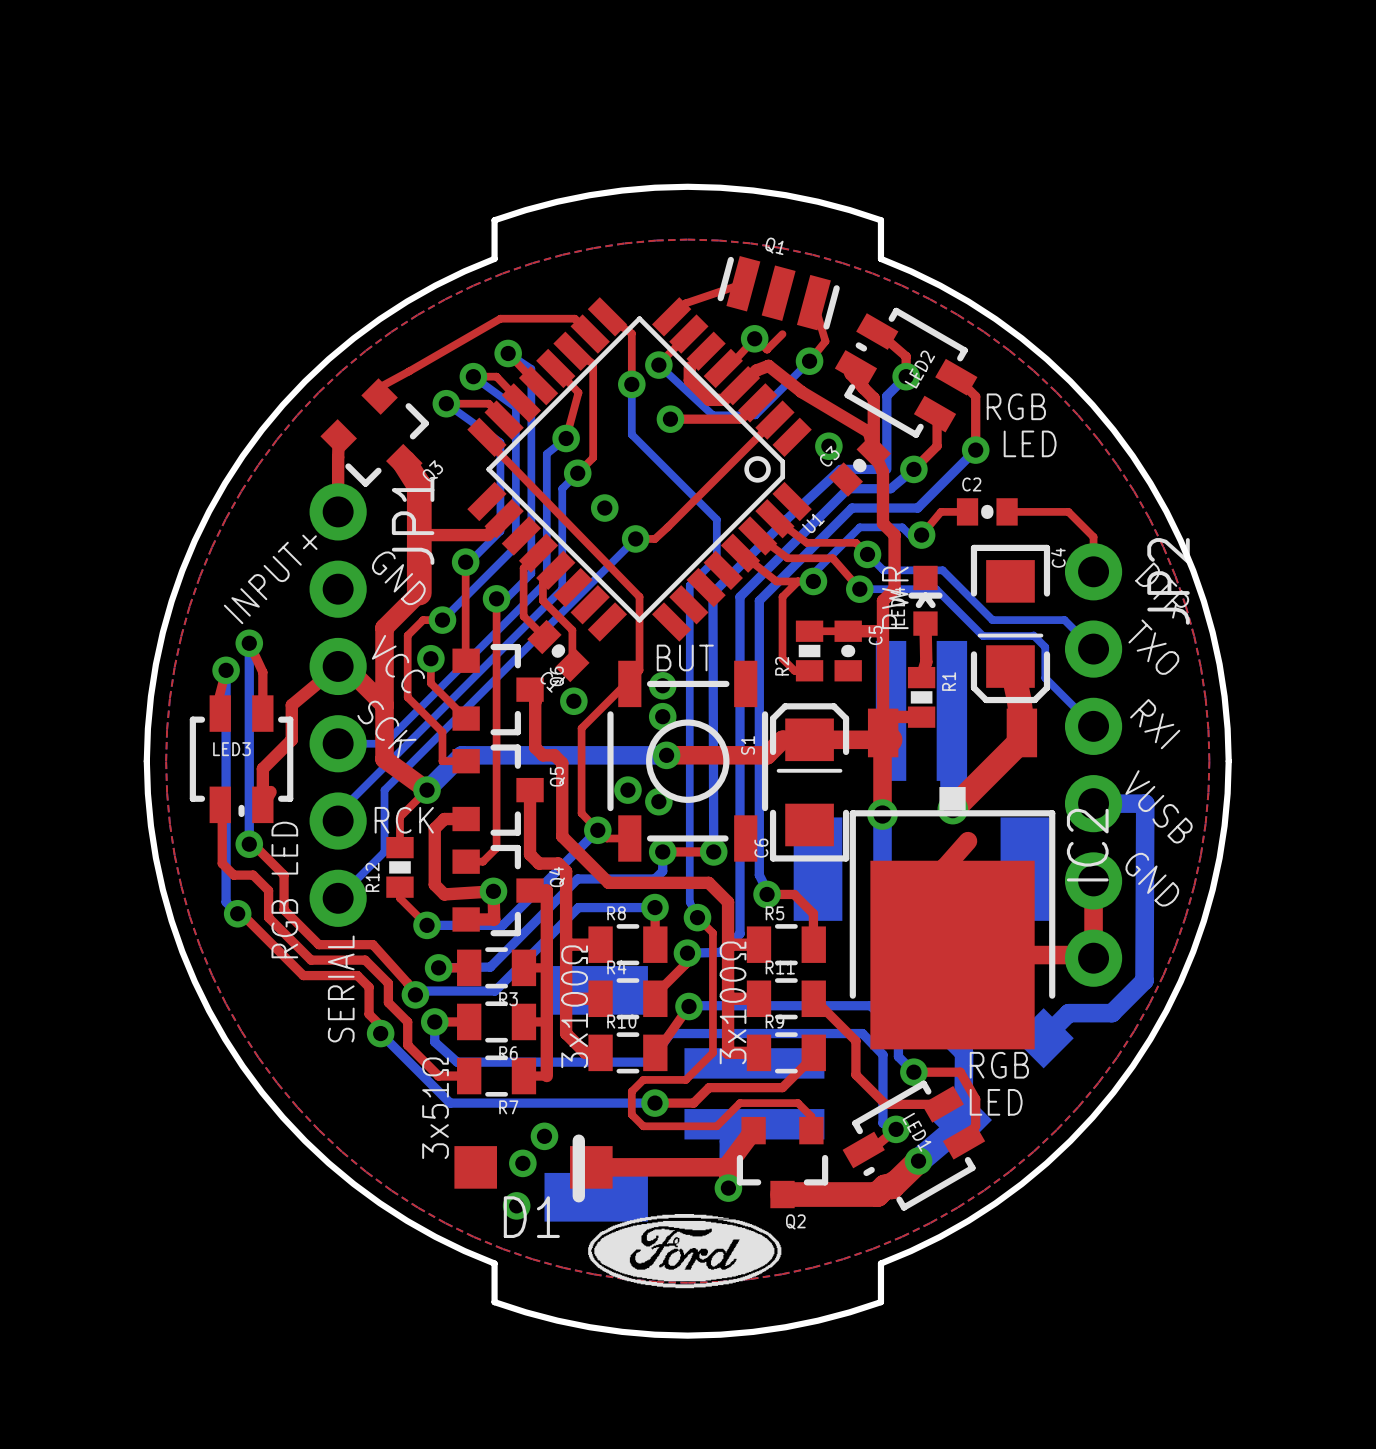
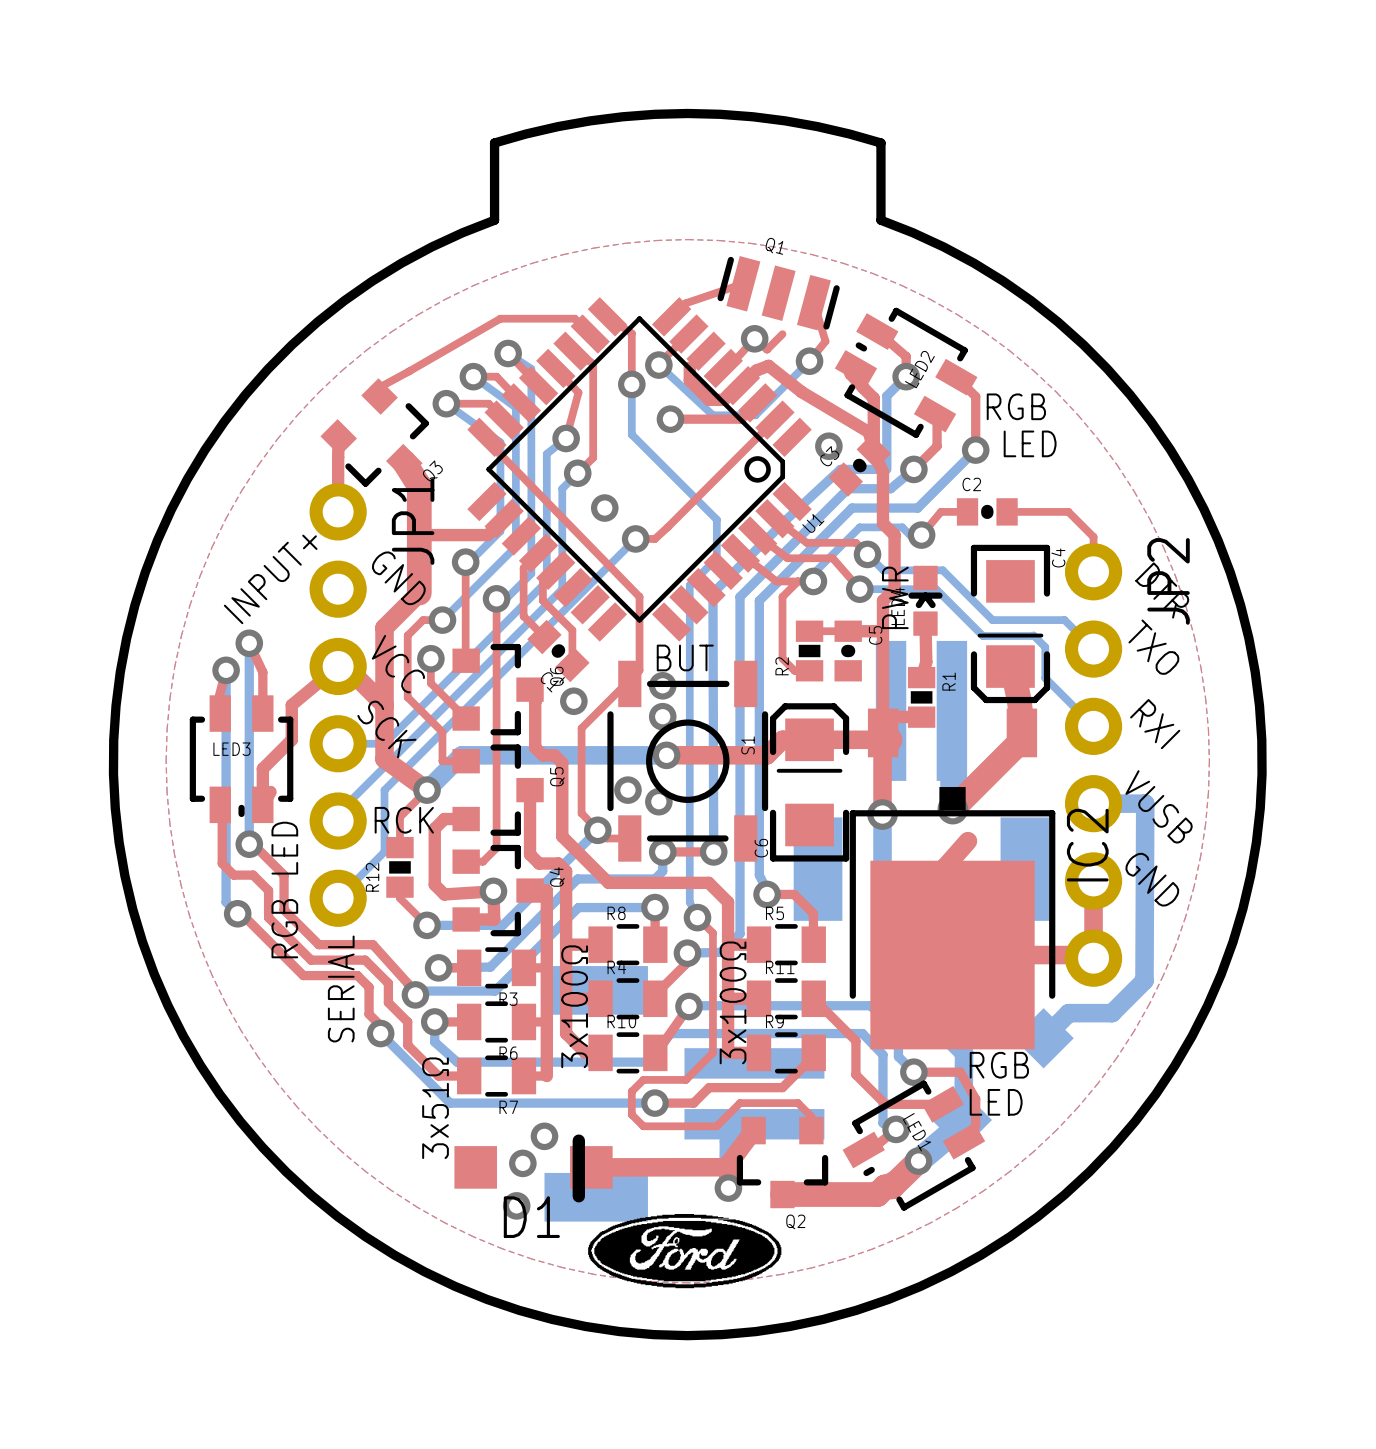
board edge: (494, 220) (494, 258) (435, 285) (379, 319) (328, 359) (282, 405) (242, 456) (209, 511) (194, 540) (171, 601) (155, 664) (147, 728) (146, 761) (147, 793) (155, 858) (171, 921) (182, 951) (209, 1010) (225, 1039) (242, 1066) (282, 1117) (328, 1163) (379, 1203) (435, 1236) (494, 1263) (494, 1302) (557, 1320) (589, 1327) (654, 1334) (687, 1335) (720, 1334) (785, 1327) (817, 1320) (880, 1302) (880, 1263) (940, 1236) (995, 1203) (1046, 1163) (1092, 1117) (1132, 1066) (1166, 1010) (1180, 981) (1203, 921) (1219, 858) (1227, 793) (1228, 761) (1227, 728) (1219, 664) (1203, 601) (1193, 570) (1166, 511) (1150, 483) (1132, 456) (1092, 405) (1046, 359) (995, 319) (940, 285) (880, 258) (880, 220) (817, 201) (785, 195) (720, 187) (687, 186) (654, 187) (589, 195) (557, 201) (494, 220) -> (494, 142) (494, 220) (462, 232) (401, 263) (344, 300) (292, 344) (245, 394) (205, 449) (171, 509) (157, 540) (145, 572) (126, 638) (120, 671) (113, 740) (115, 808) (119, 842) (132, 909) (142, 942) (167, 1005) (183, 1036) (219, 1094) (262, 1147) (286, 1171) (337, 1216) (394, 1255) (424, 1271) (486, 1299) (519, 1310) (585, 1326) (619, 1331) (687, 1335) (756, 1331) (789, 1326) (856, 1310) (888, 1299) (951, 1271) (981, 1255) (1037, 1216) (1089, 1171) (1113, 1147) (1155, 1094) (1192, 1036) (1207, 1005) (1232, 942) (1250, 876) (1260, 808) (1261, 740) (1259, 705) (1255, 671) (1240, 605) (1218, 540) (1188, 479) (1151, 421) (1107, 369) (1057, 321) (1003, 281) (943, 247) (880, 220) (880, 142) (849, 134) (785, 120) (753, 116) (687, 113) (622, 116) (590, 120) (526, 134) (494, 142)

